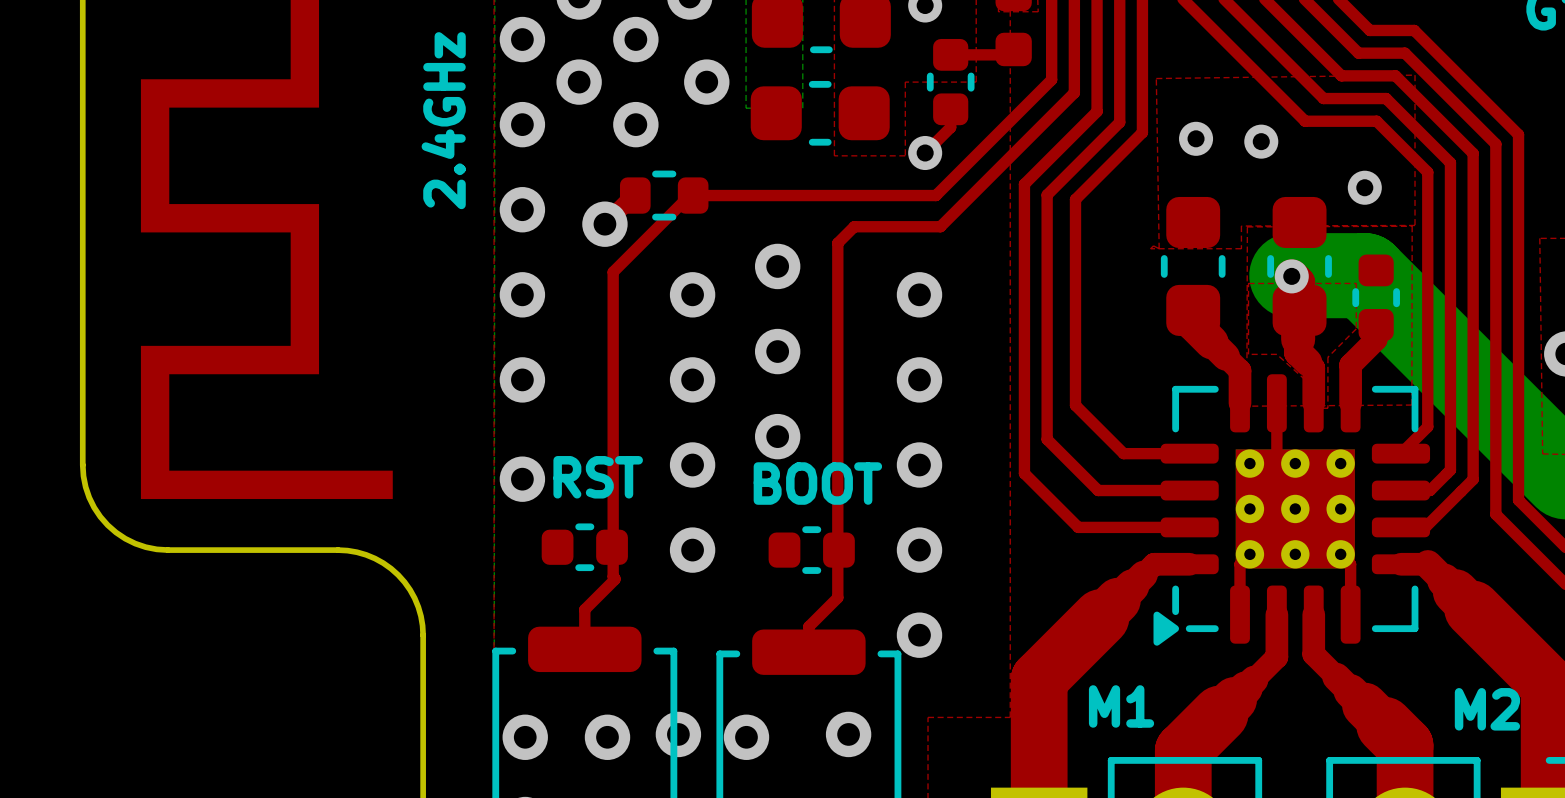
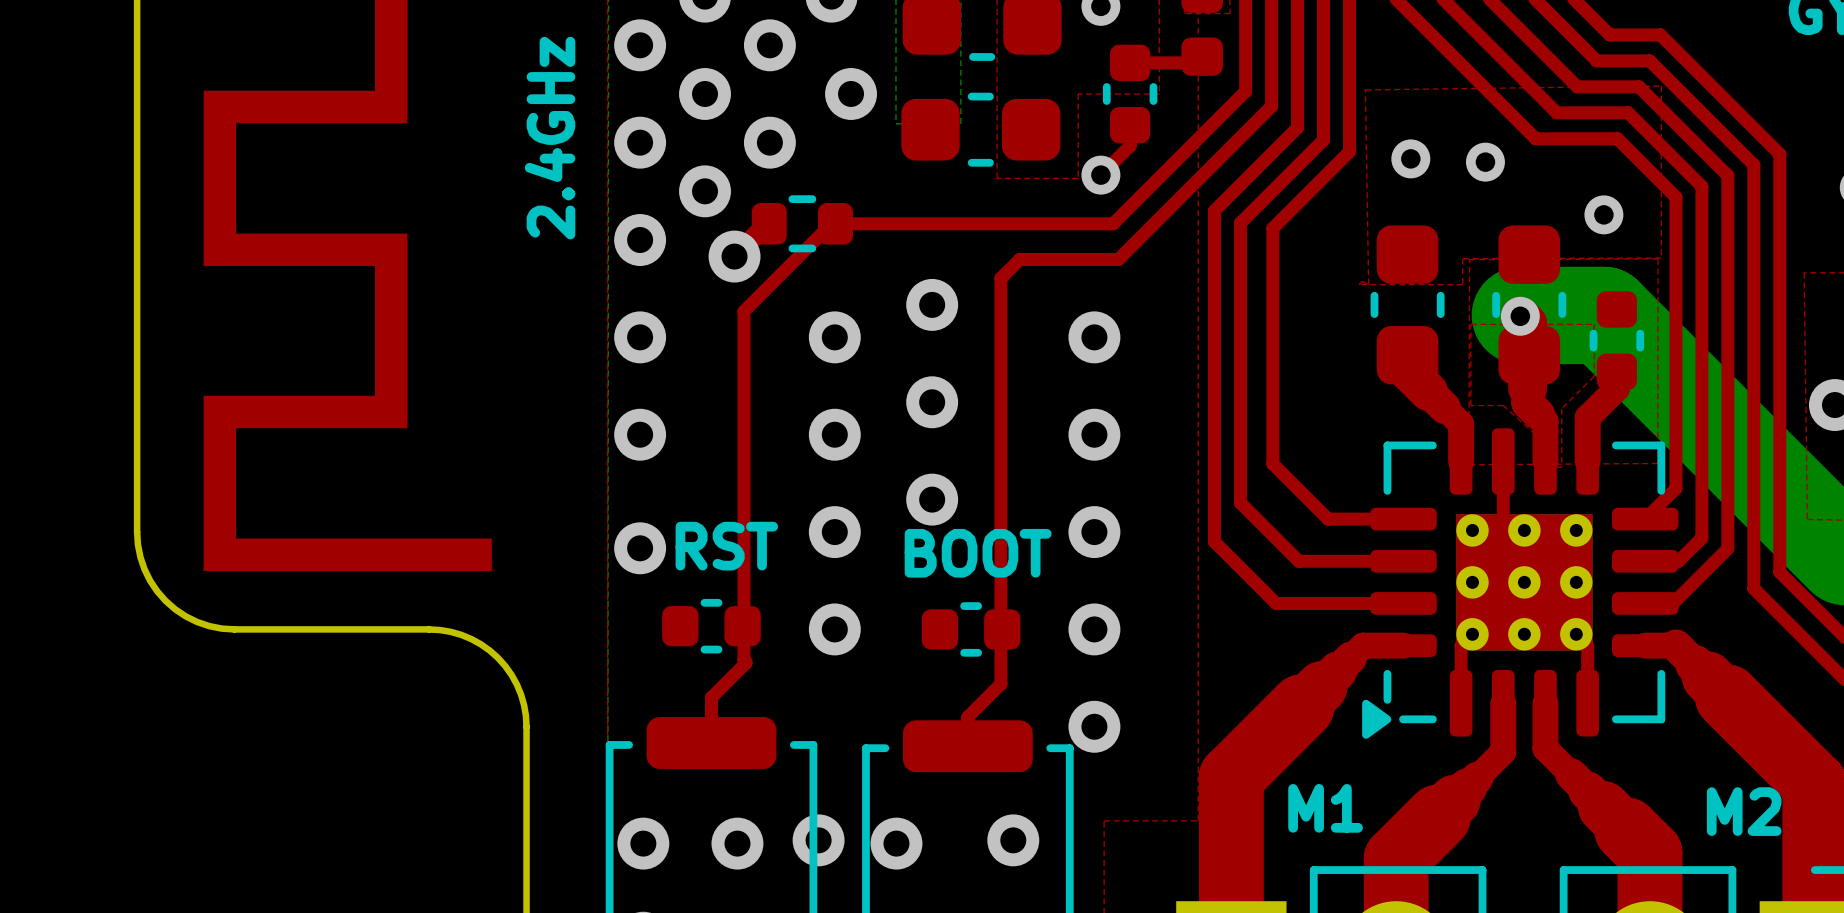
via: none -> (705, 191)

